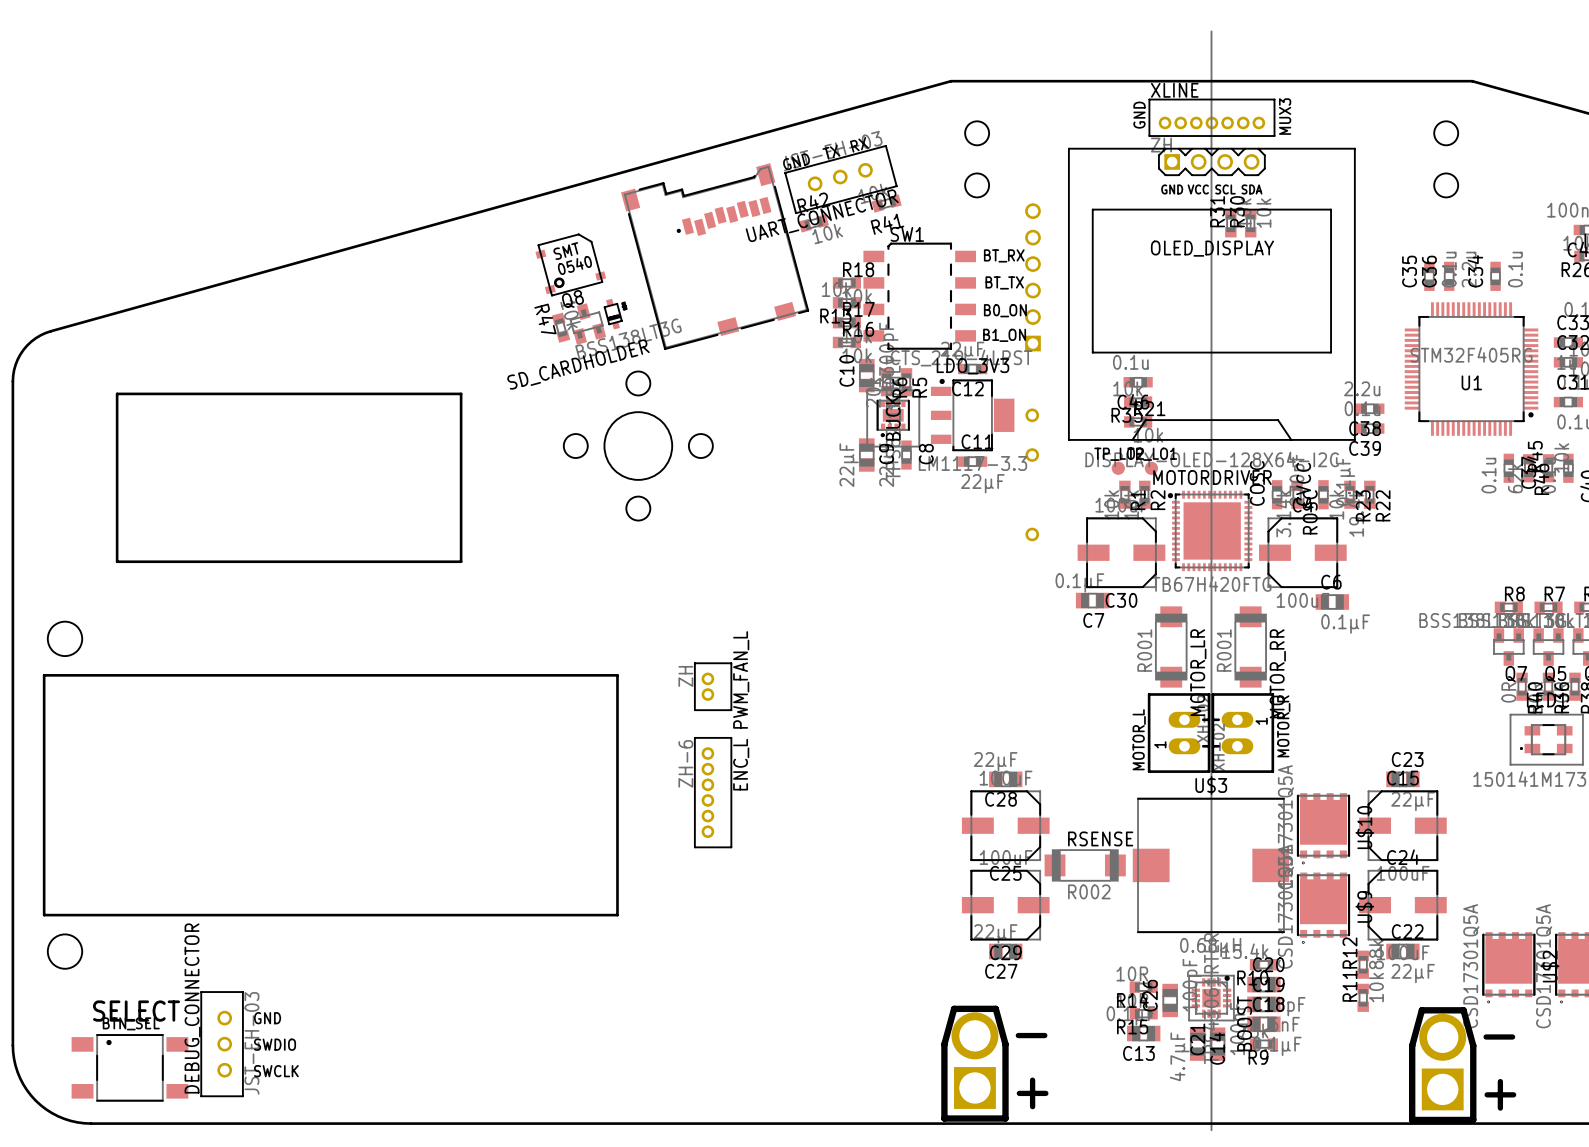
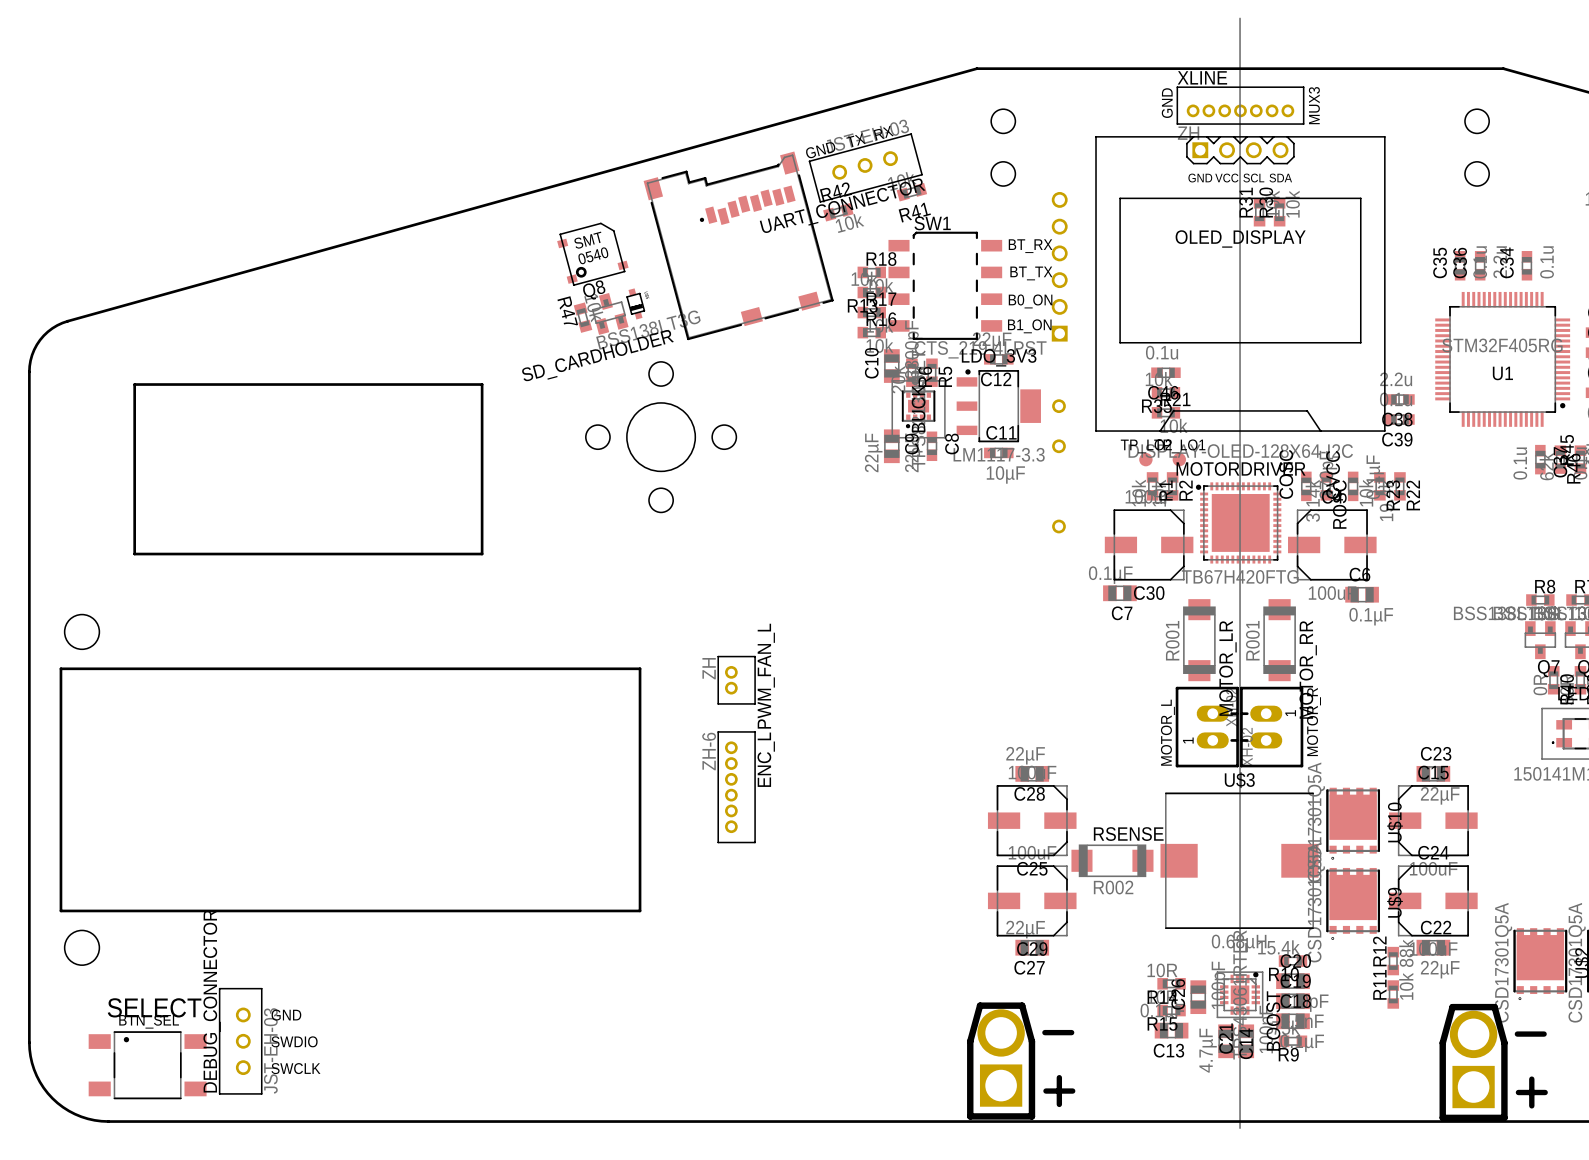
C11 value: 22µF (982, 483) -> 10µF (1005, 474)

